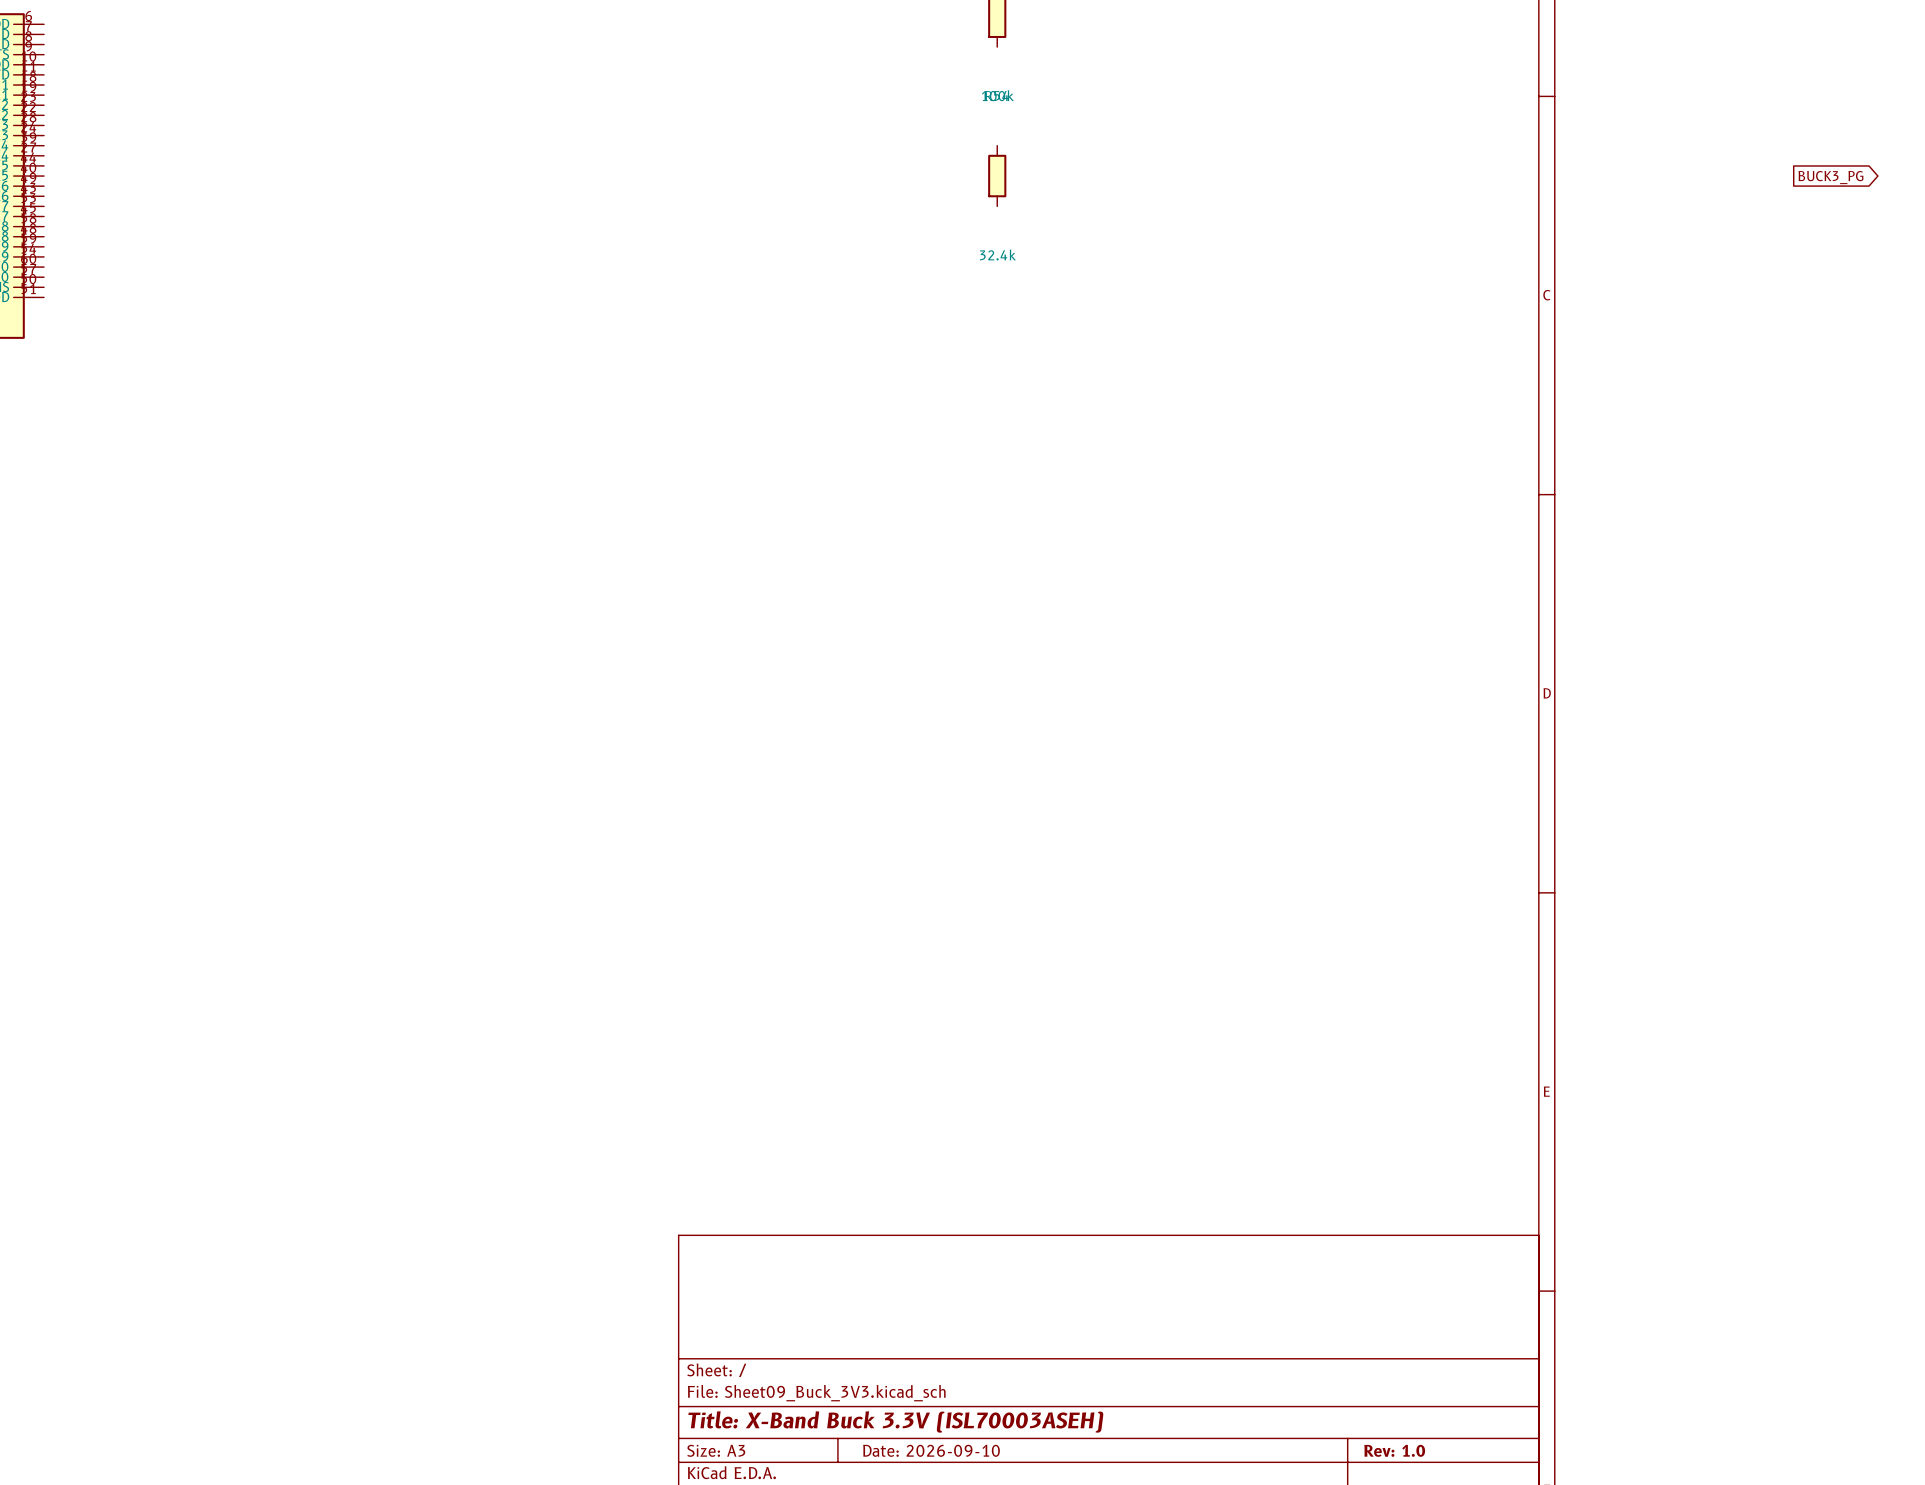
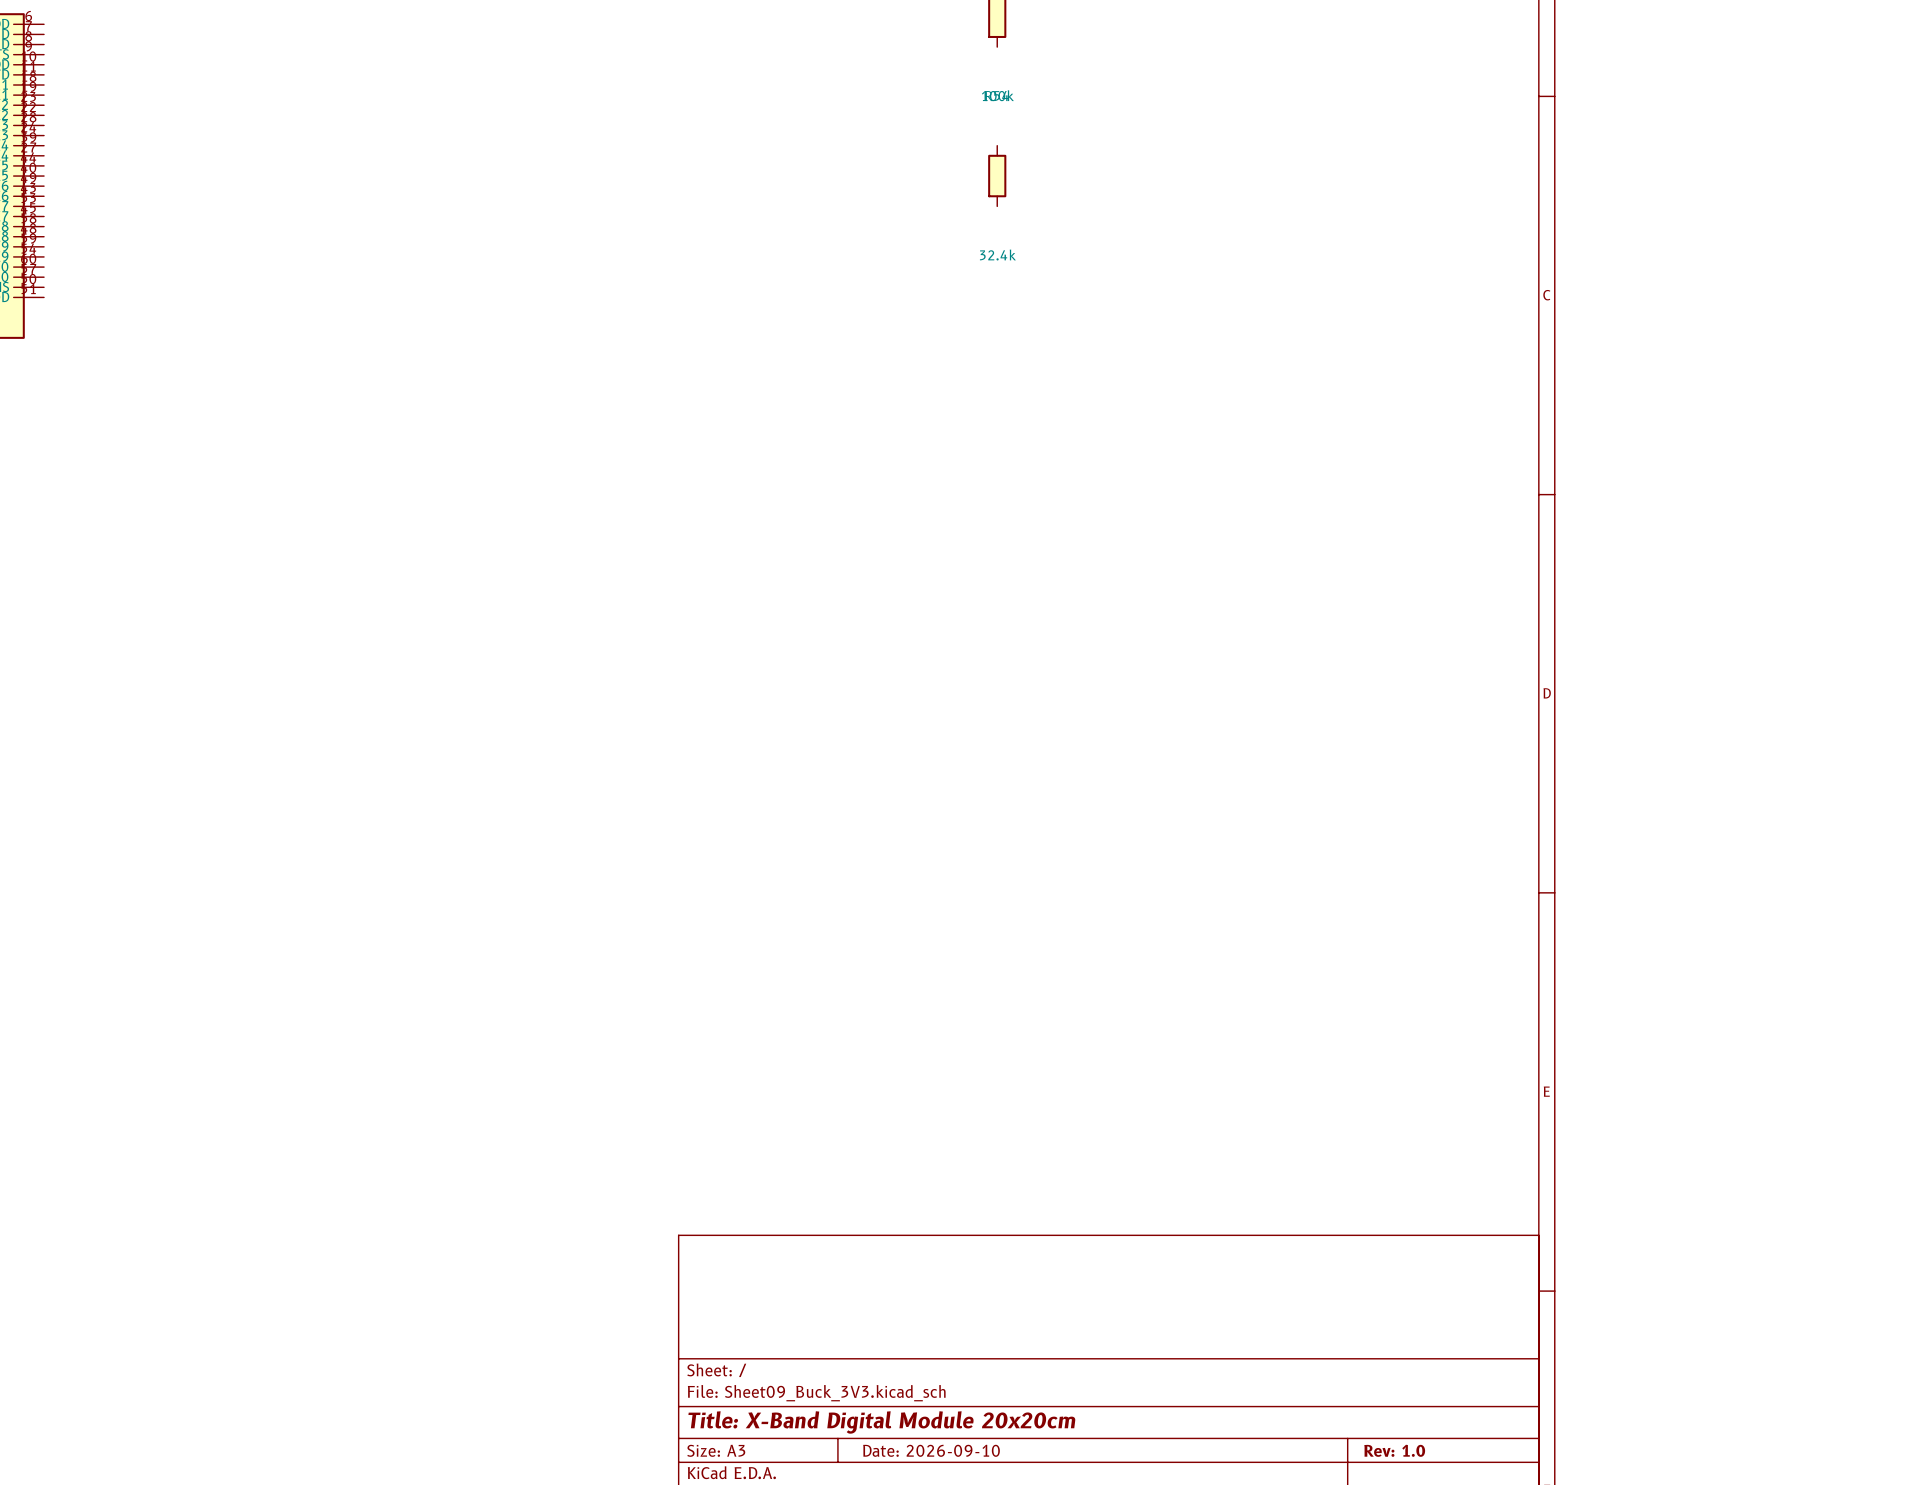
global label: BUCK3_PG (1830, 177) -> none
title block: Title: X-Band Buck 3.3V (ISL70003ASEH) (895, 1421) -> Title: X-Band Digital Module 20x20cm (881, 1422)

